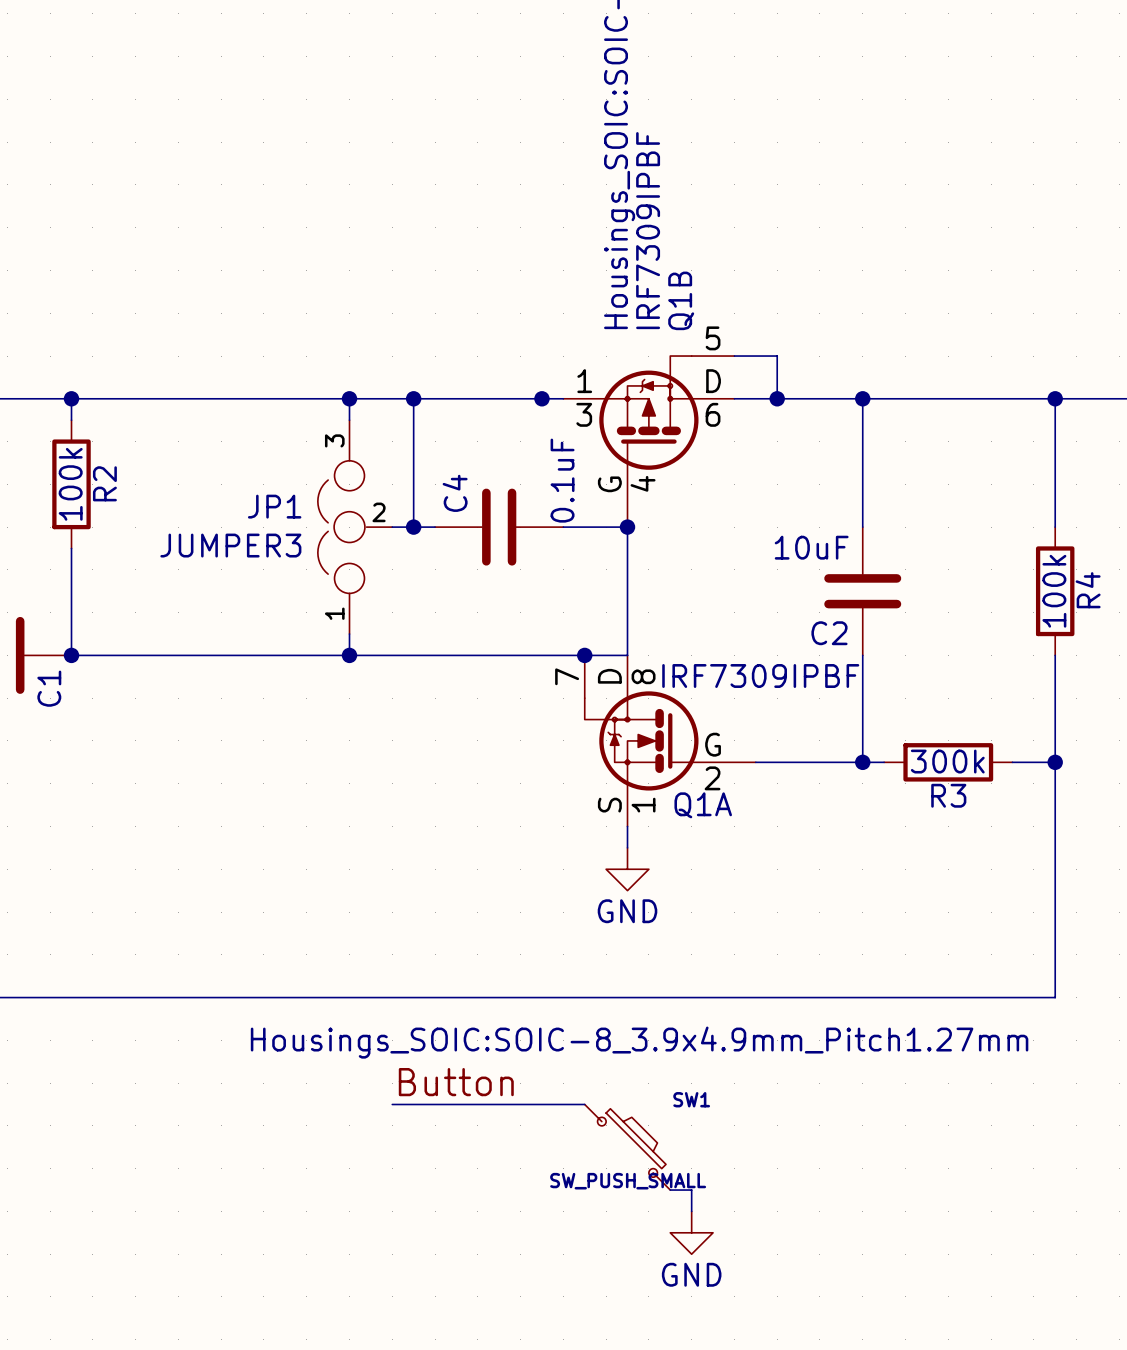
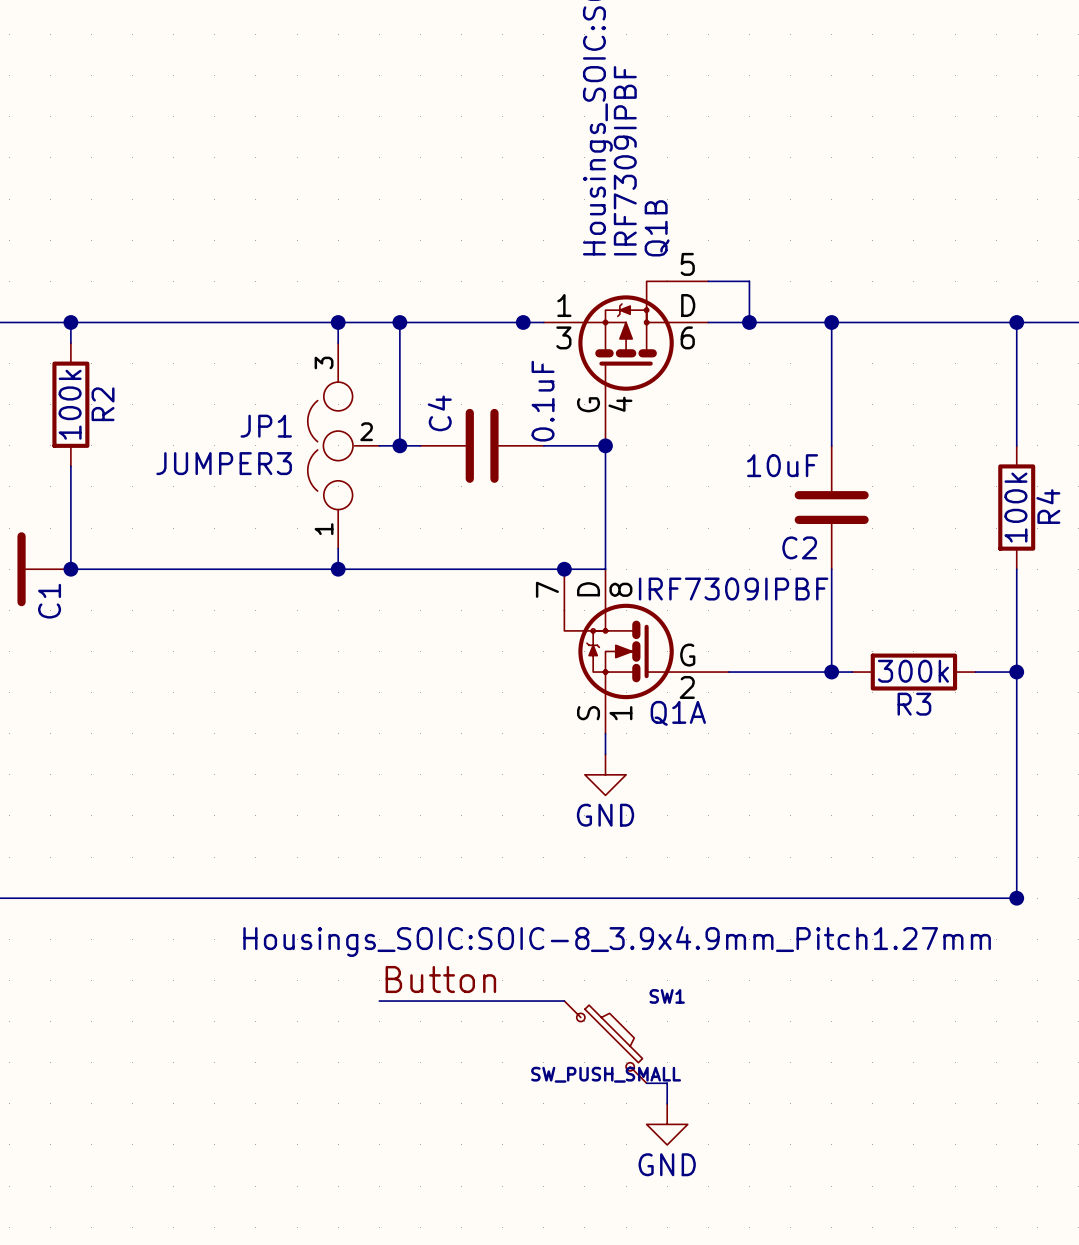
junction: none -> (1016, 898)

